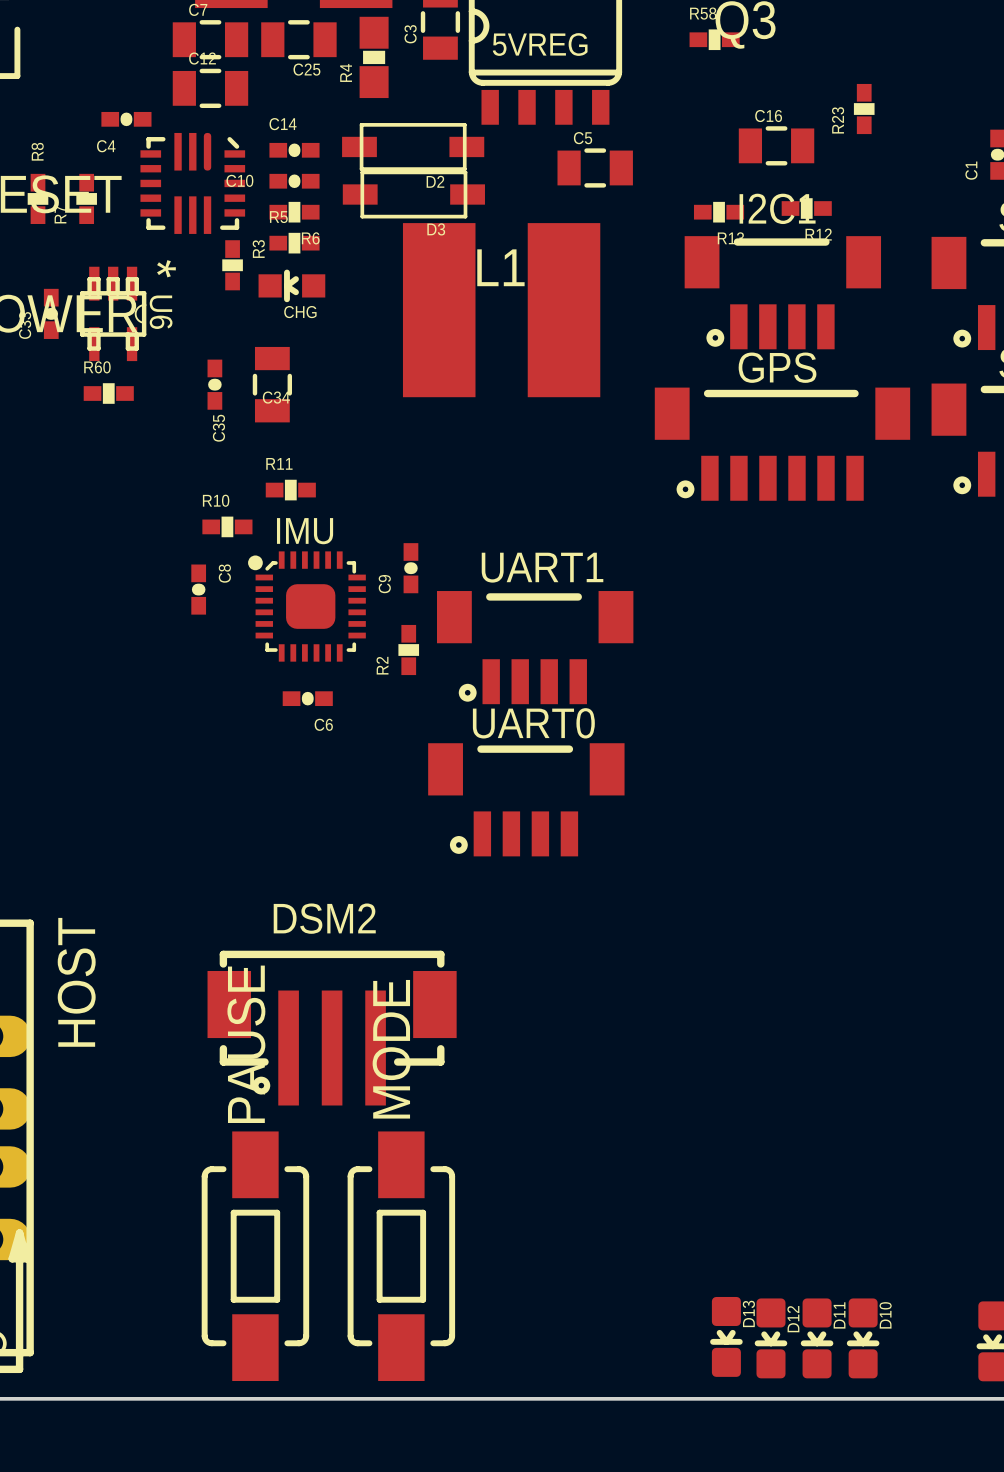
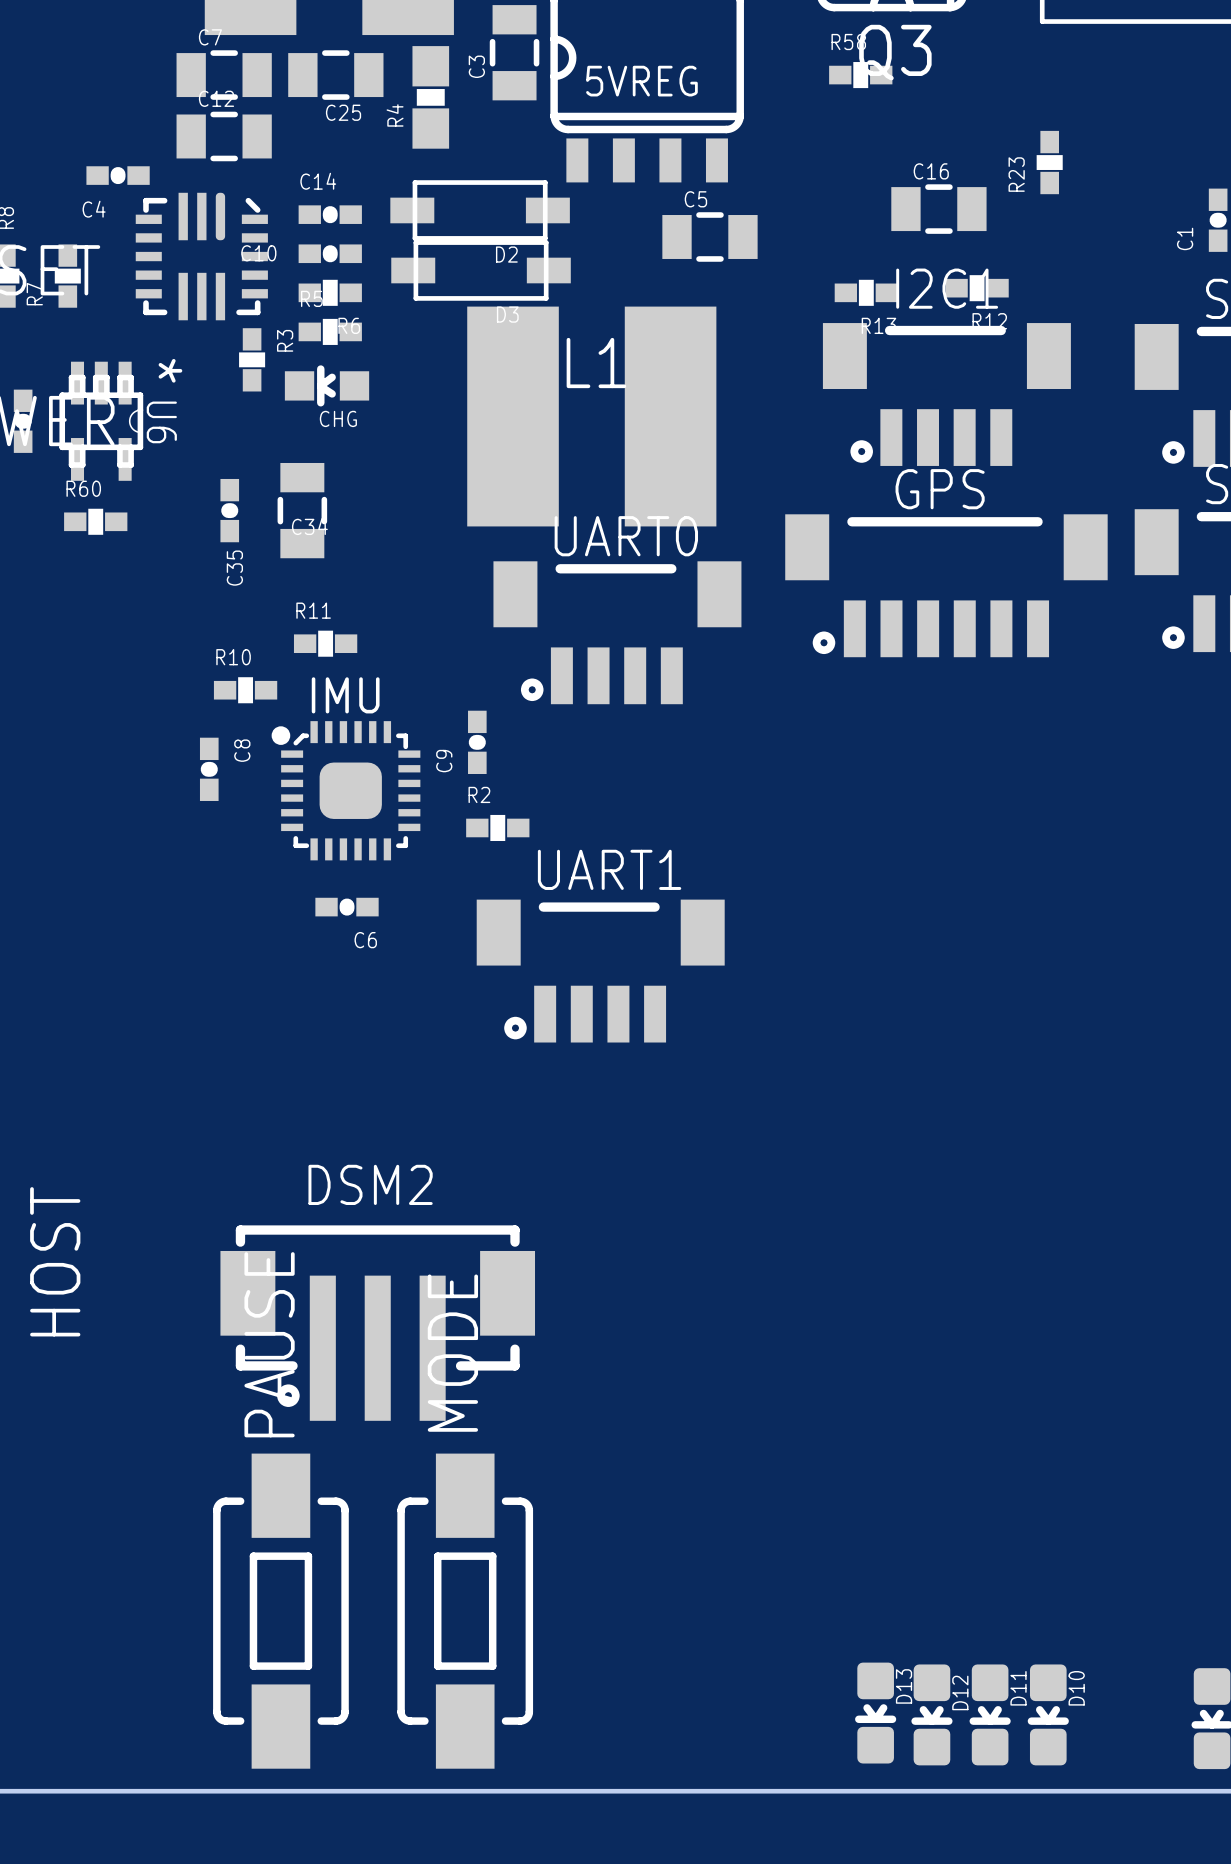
UART1 position: (535, 647) -> (600, 971)
R2 rotation: 0° (408, 650) -> 90° clockwise (497, 827)
UART0 position: (526, 799) -> (617, 632)

